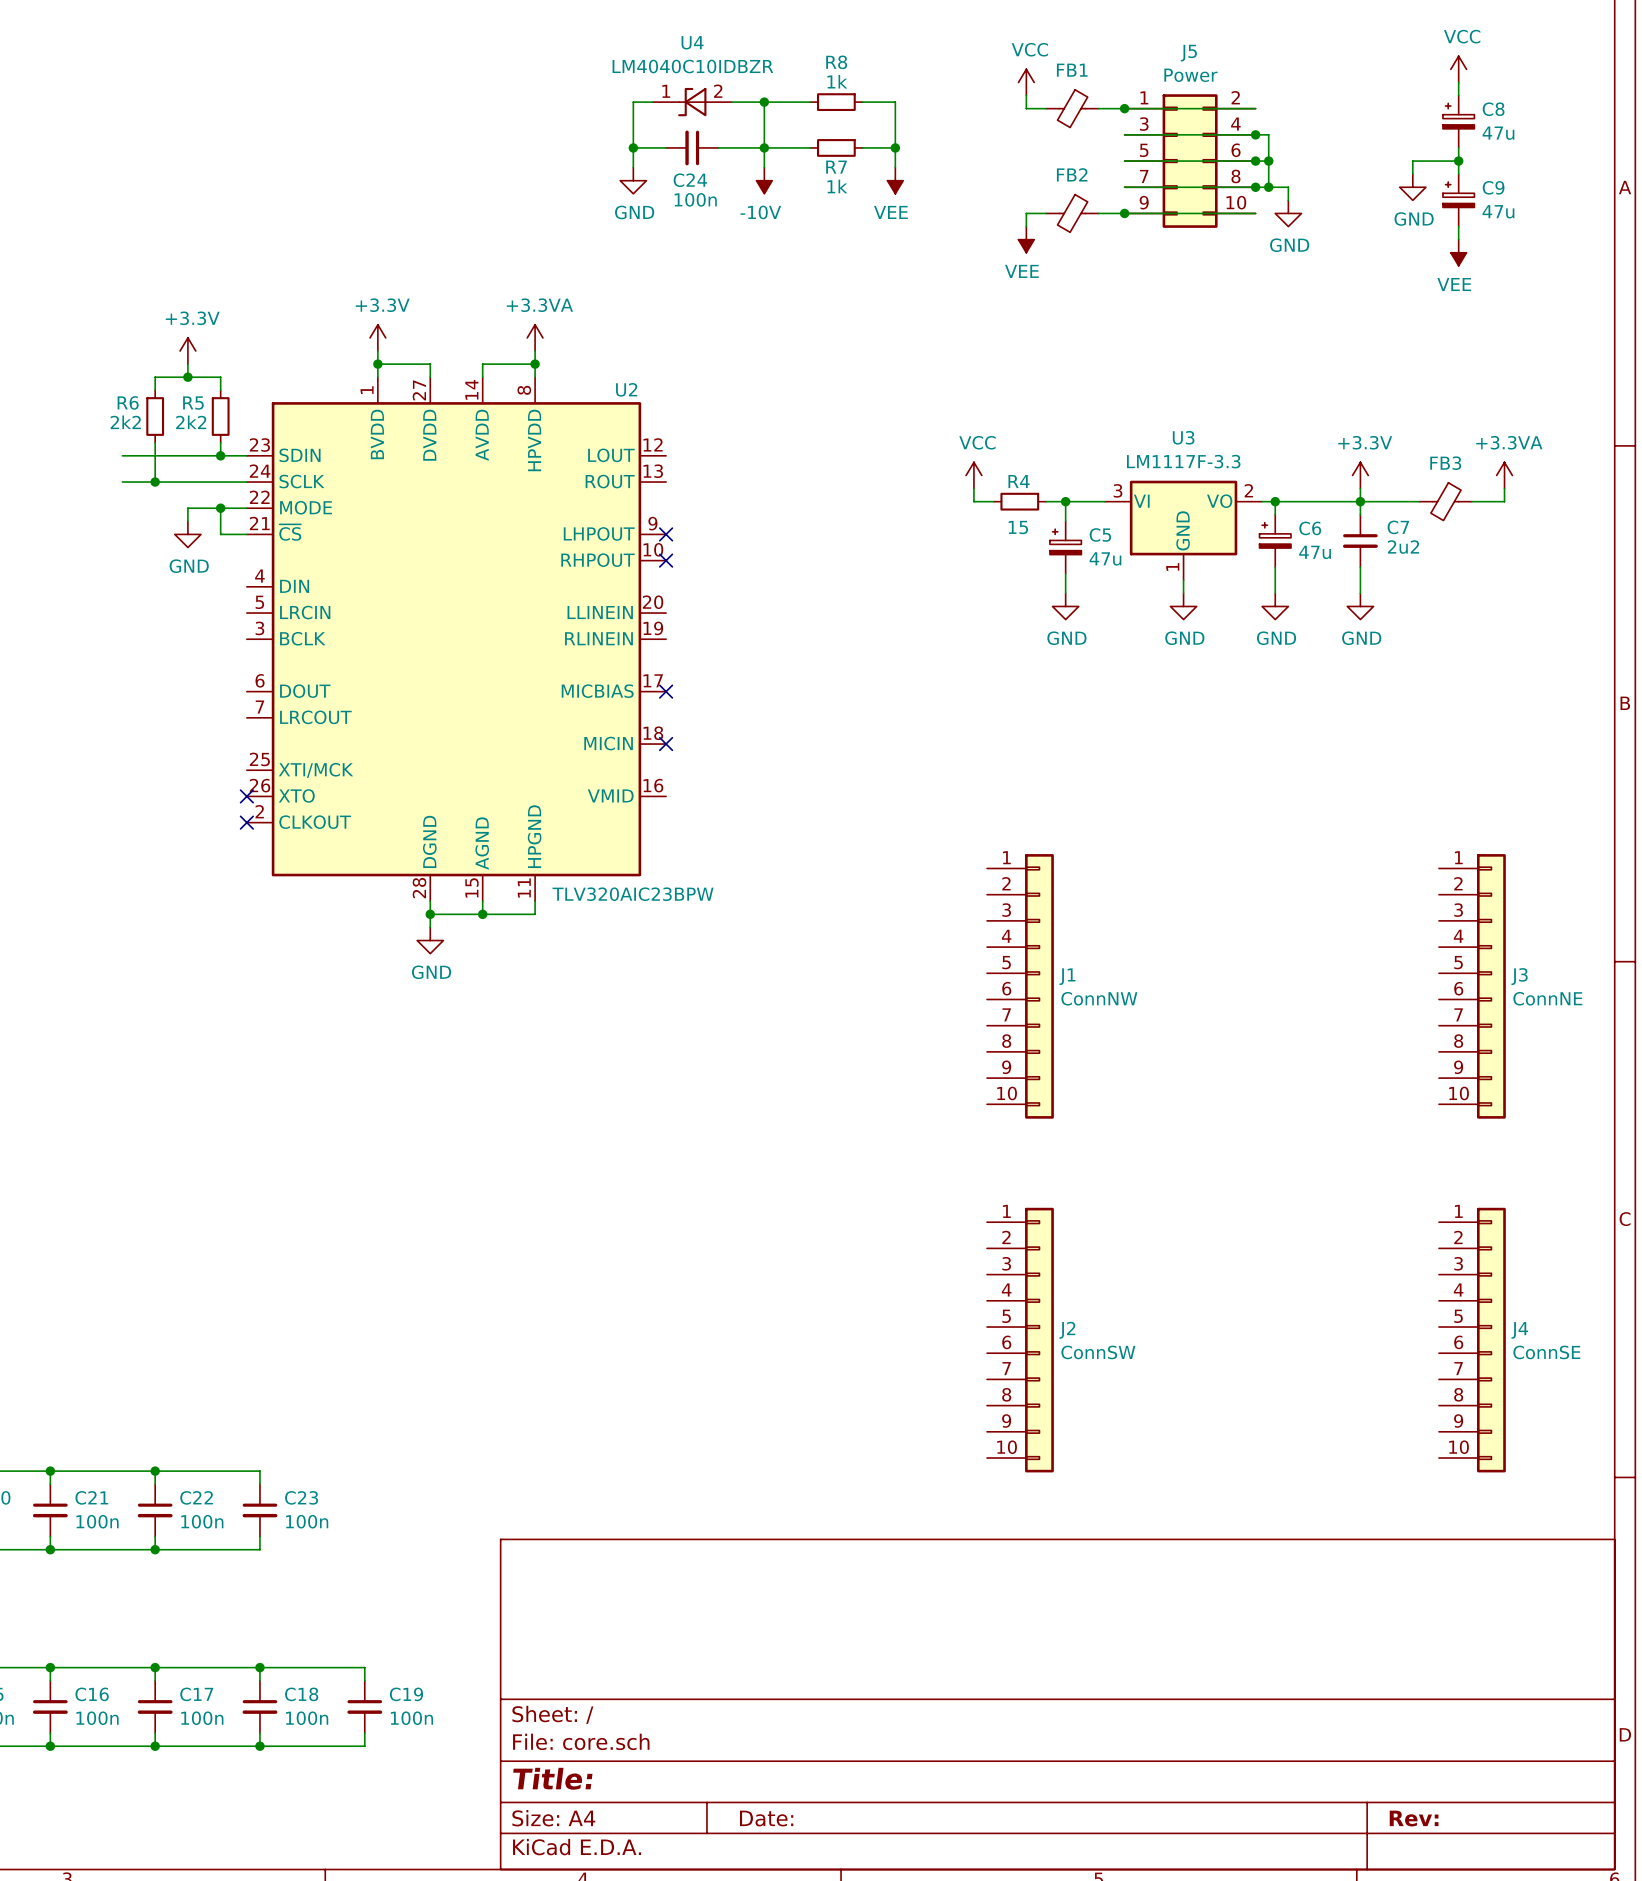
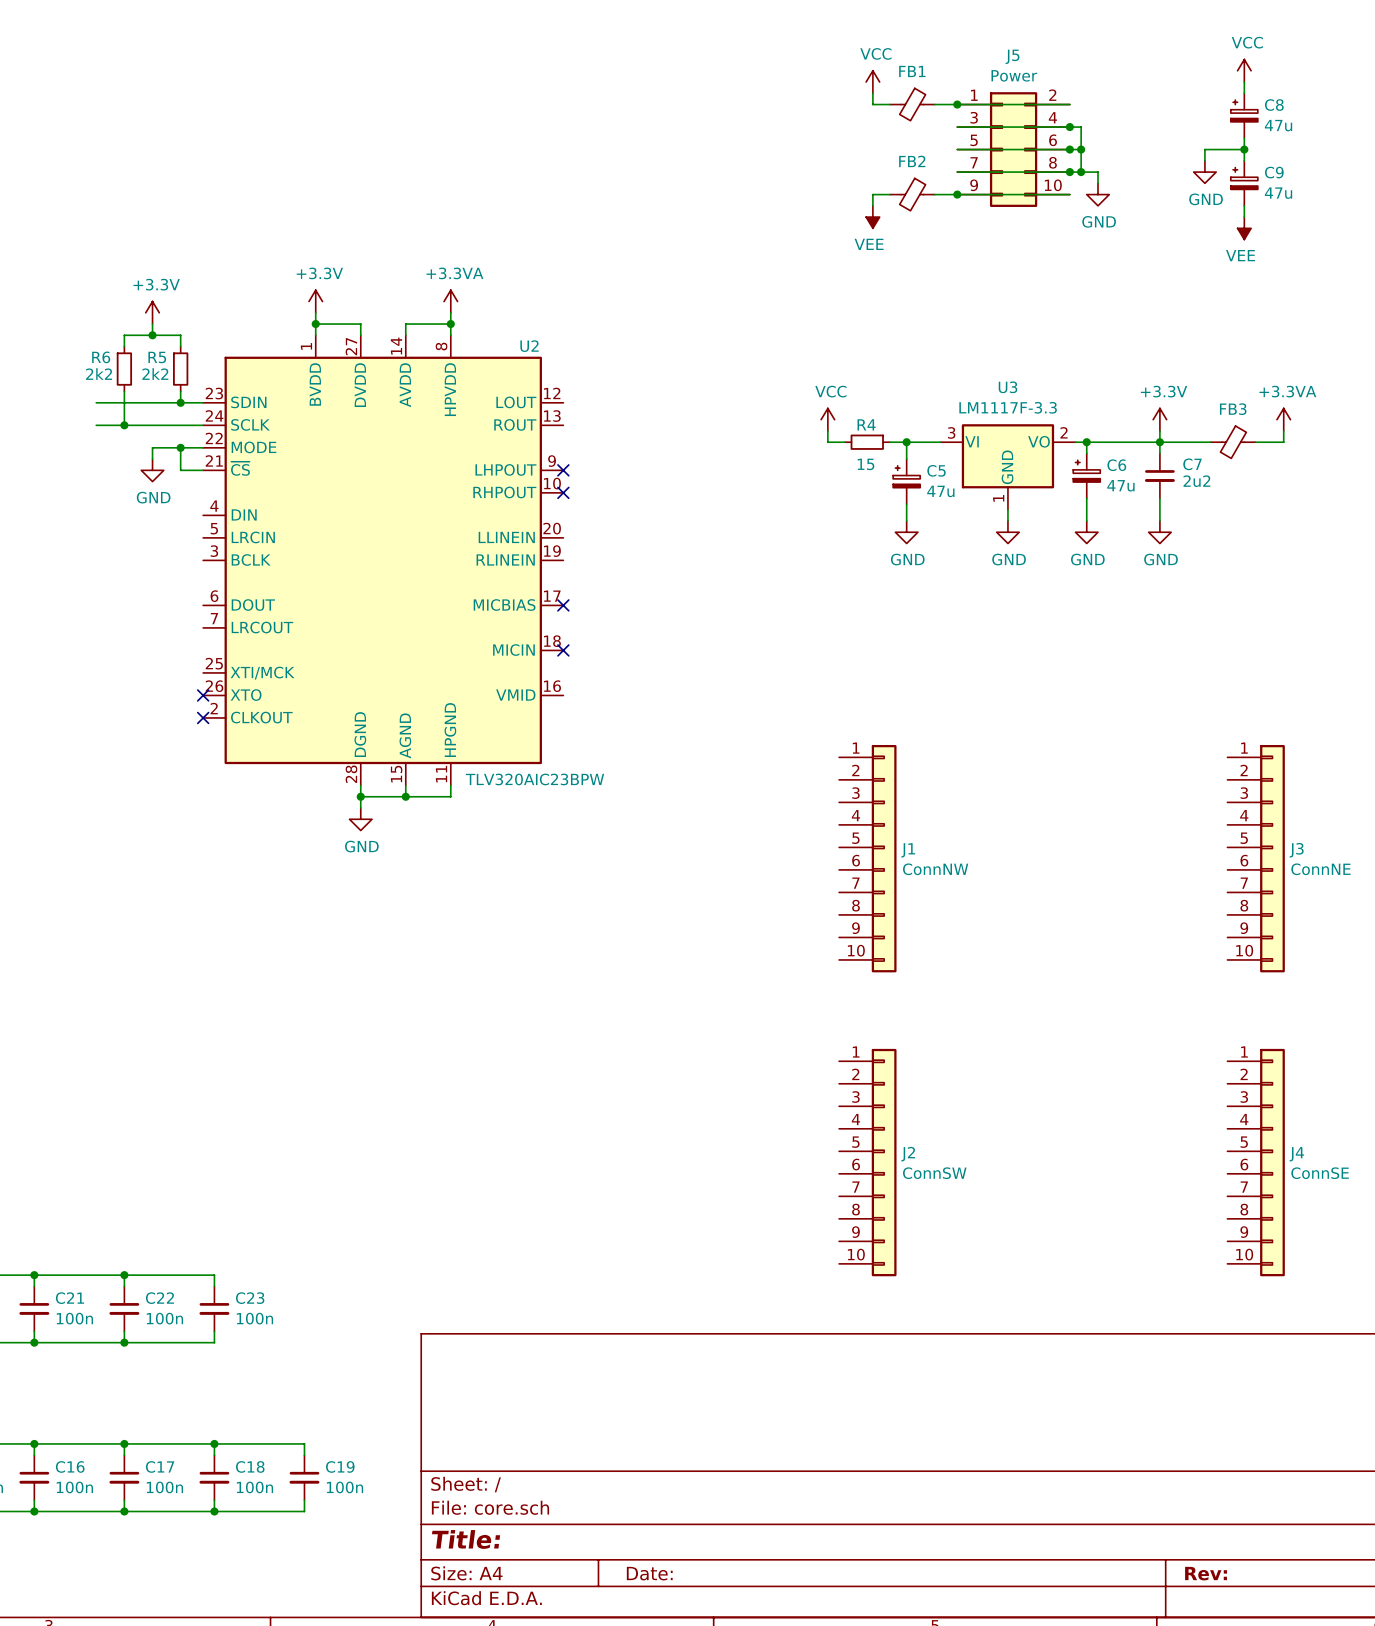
wire: (652, 102) (633, 102) (633, 167) -> none
U4: LM4040C10IDBZR (692, 102) -> none
wire: (731, 102) (810, 102) -> none
wire: (764, 102) (764, 167) -> none
junction: (764, 102) -> none
R8: 1k (836, 102) -> none
wire: (862, 102) (895, 102) (895, 167) -> none
wire: (633, 147) (666, 147) -> none
junction: (633, 147) -> none
C24: 100n (692, 147) -> none
wire: (718, 147) (810, 147) -> none
junction: (764, 147) -> none
R7: 1k (836, 147) -> none
wire: (862, 147) (895, 147) -> none
junction: (895, 147) -> none
power symbol: GND (633, 180) -> none
power symbol: -10V (764, 180) -> none
power symbol: VEE (895, 180) -> none

